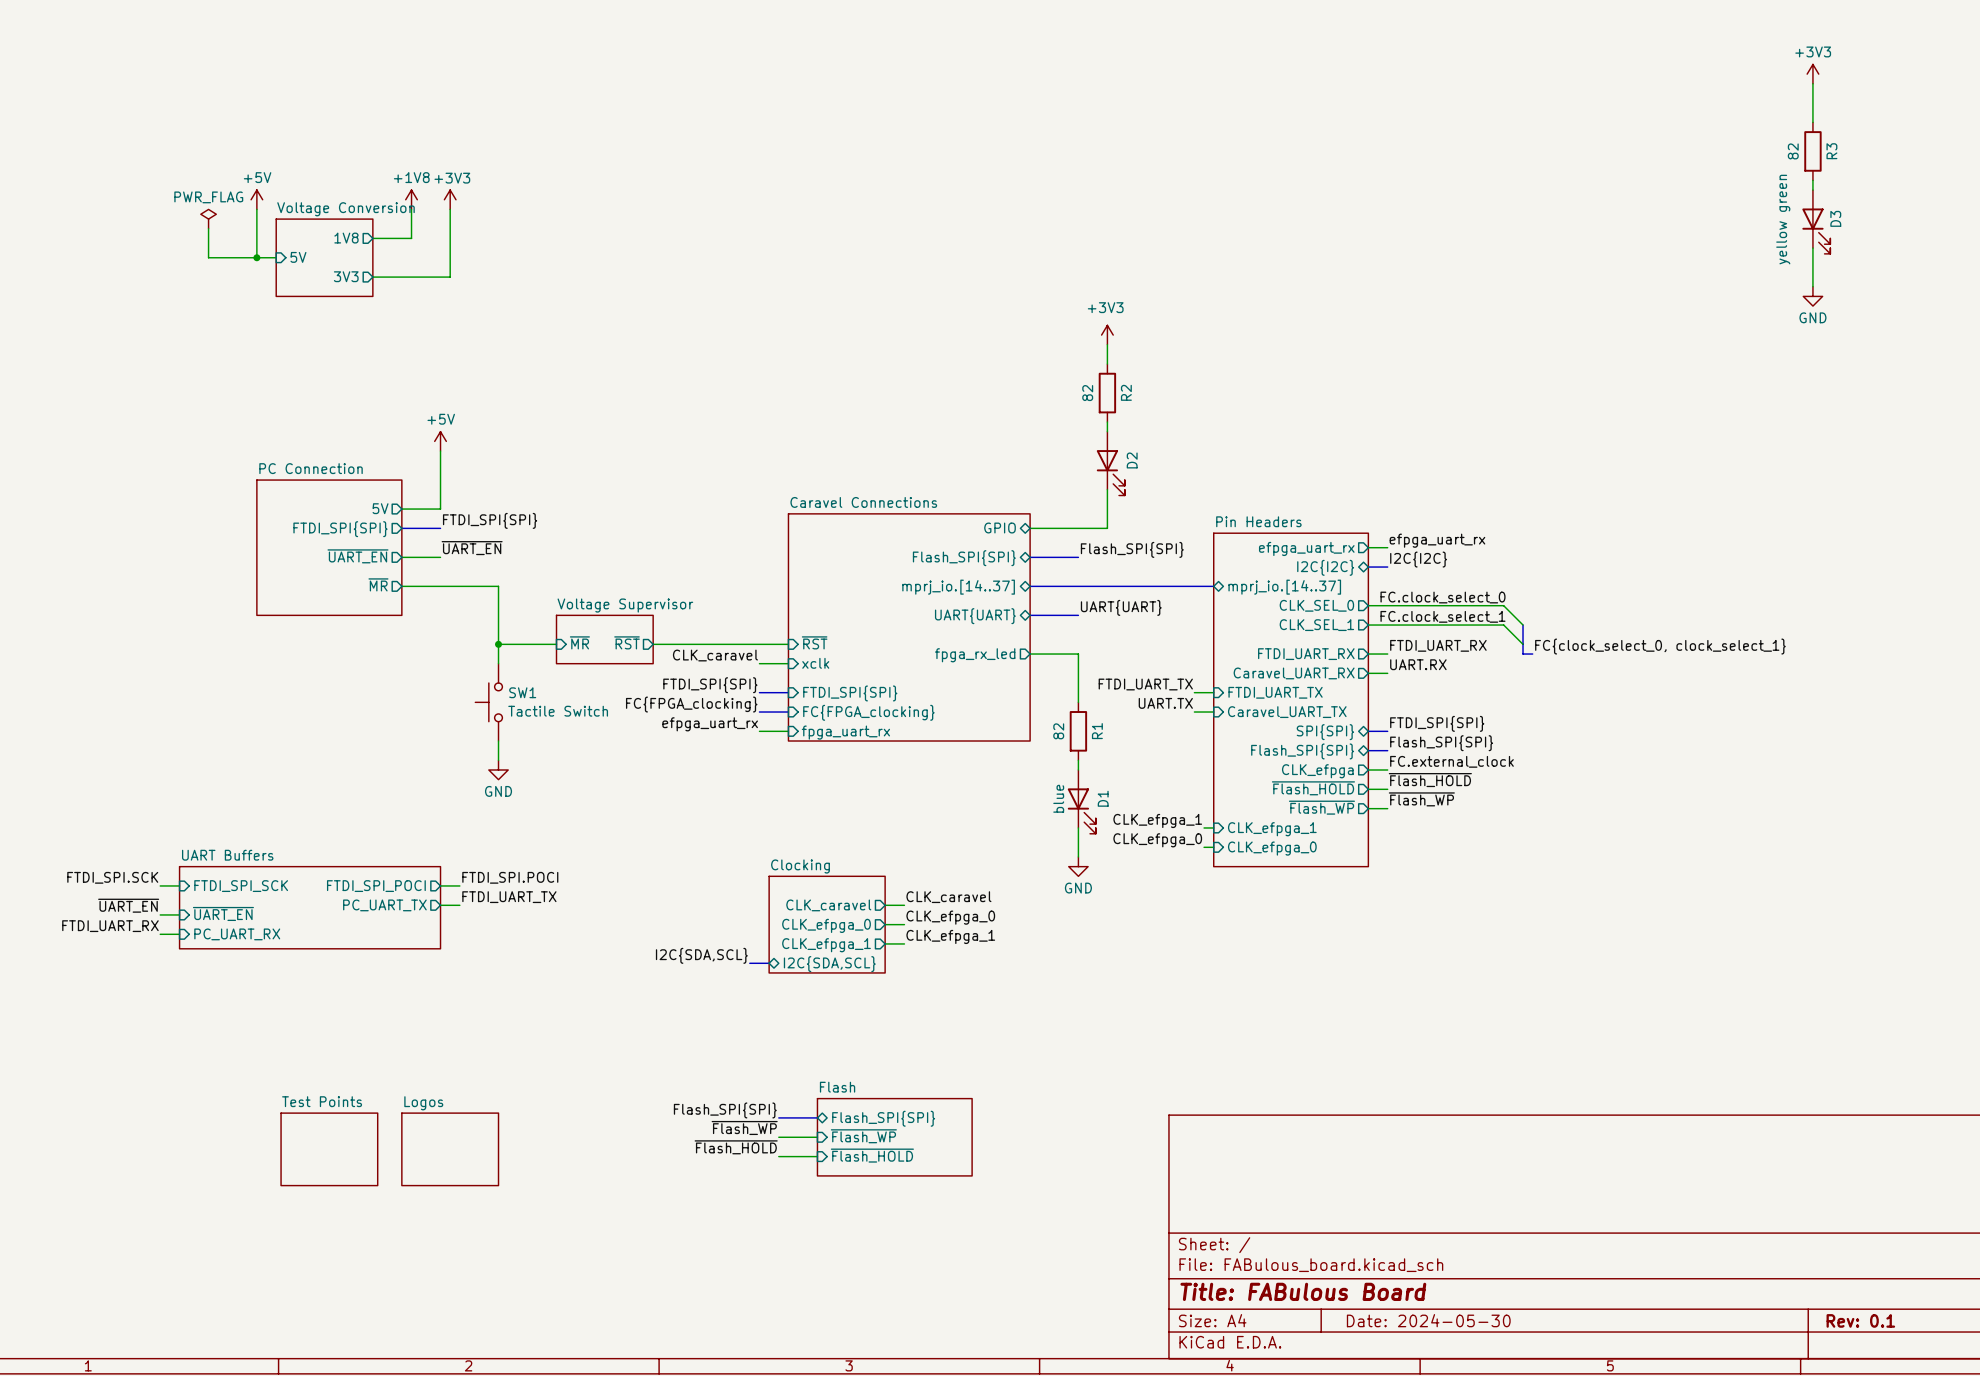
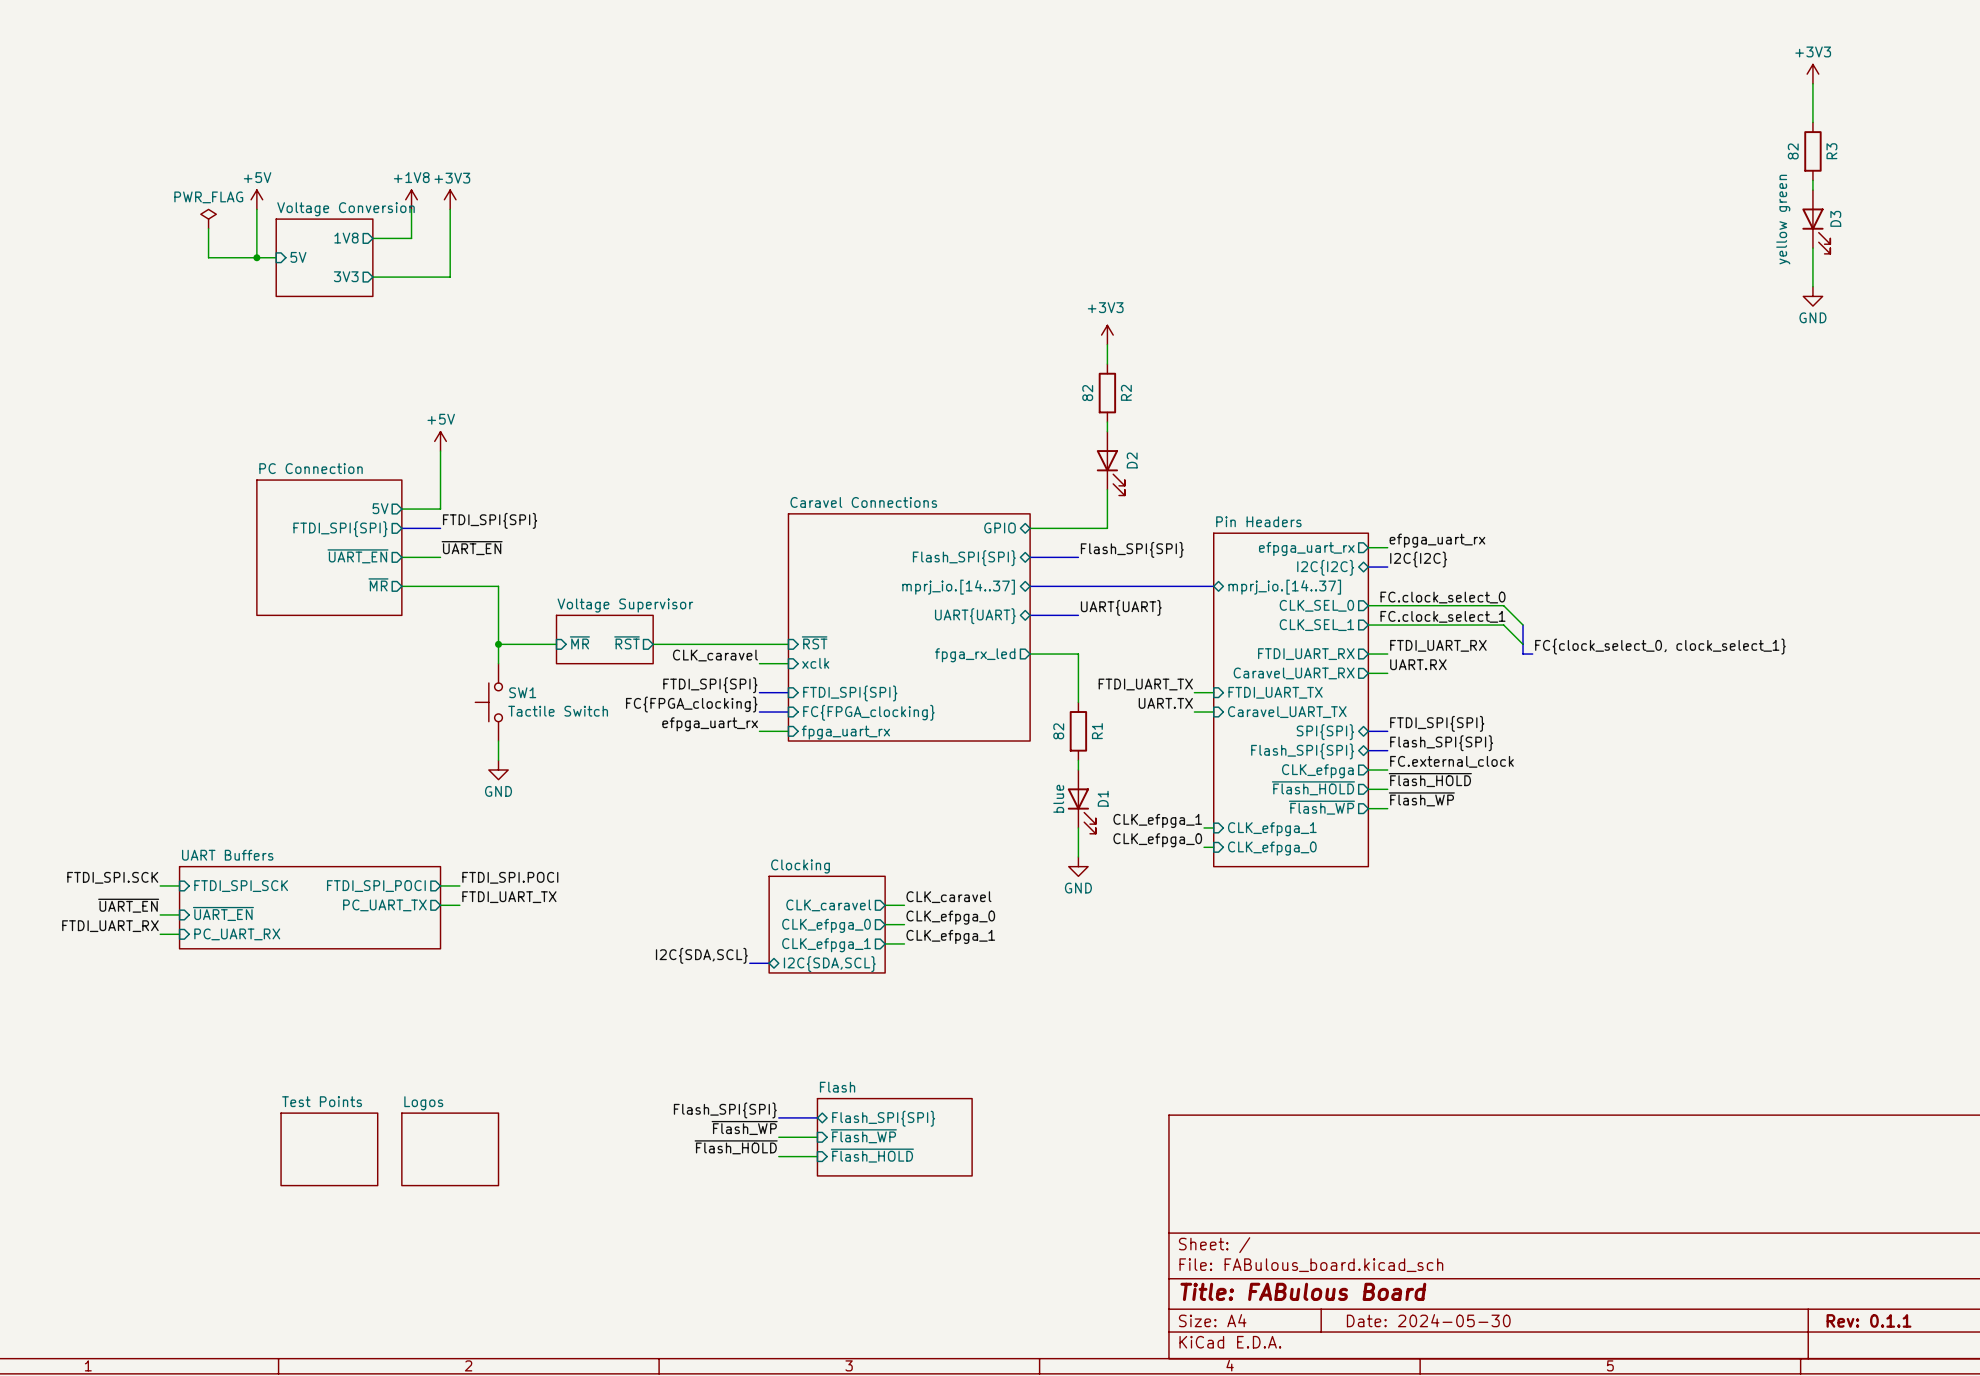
title block: Rev: 0.1 (1860, 1320) -> Rev: 0.1.1 (1868, 1320)

